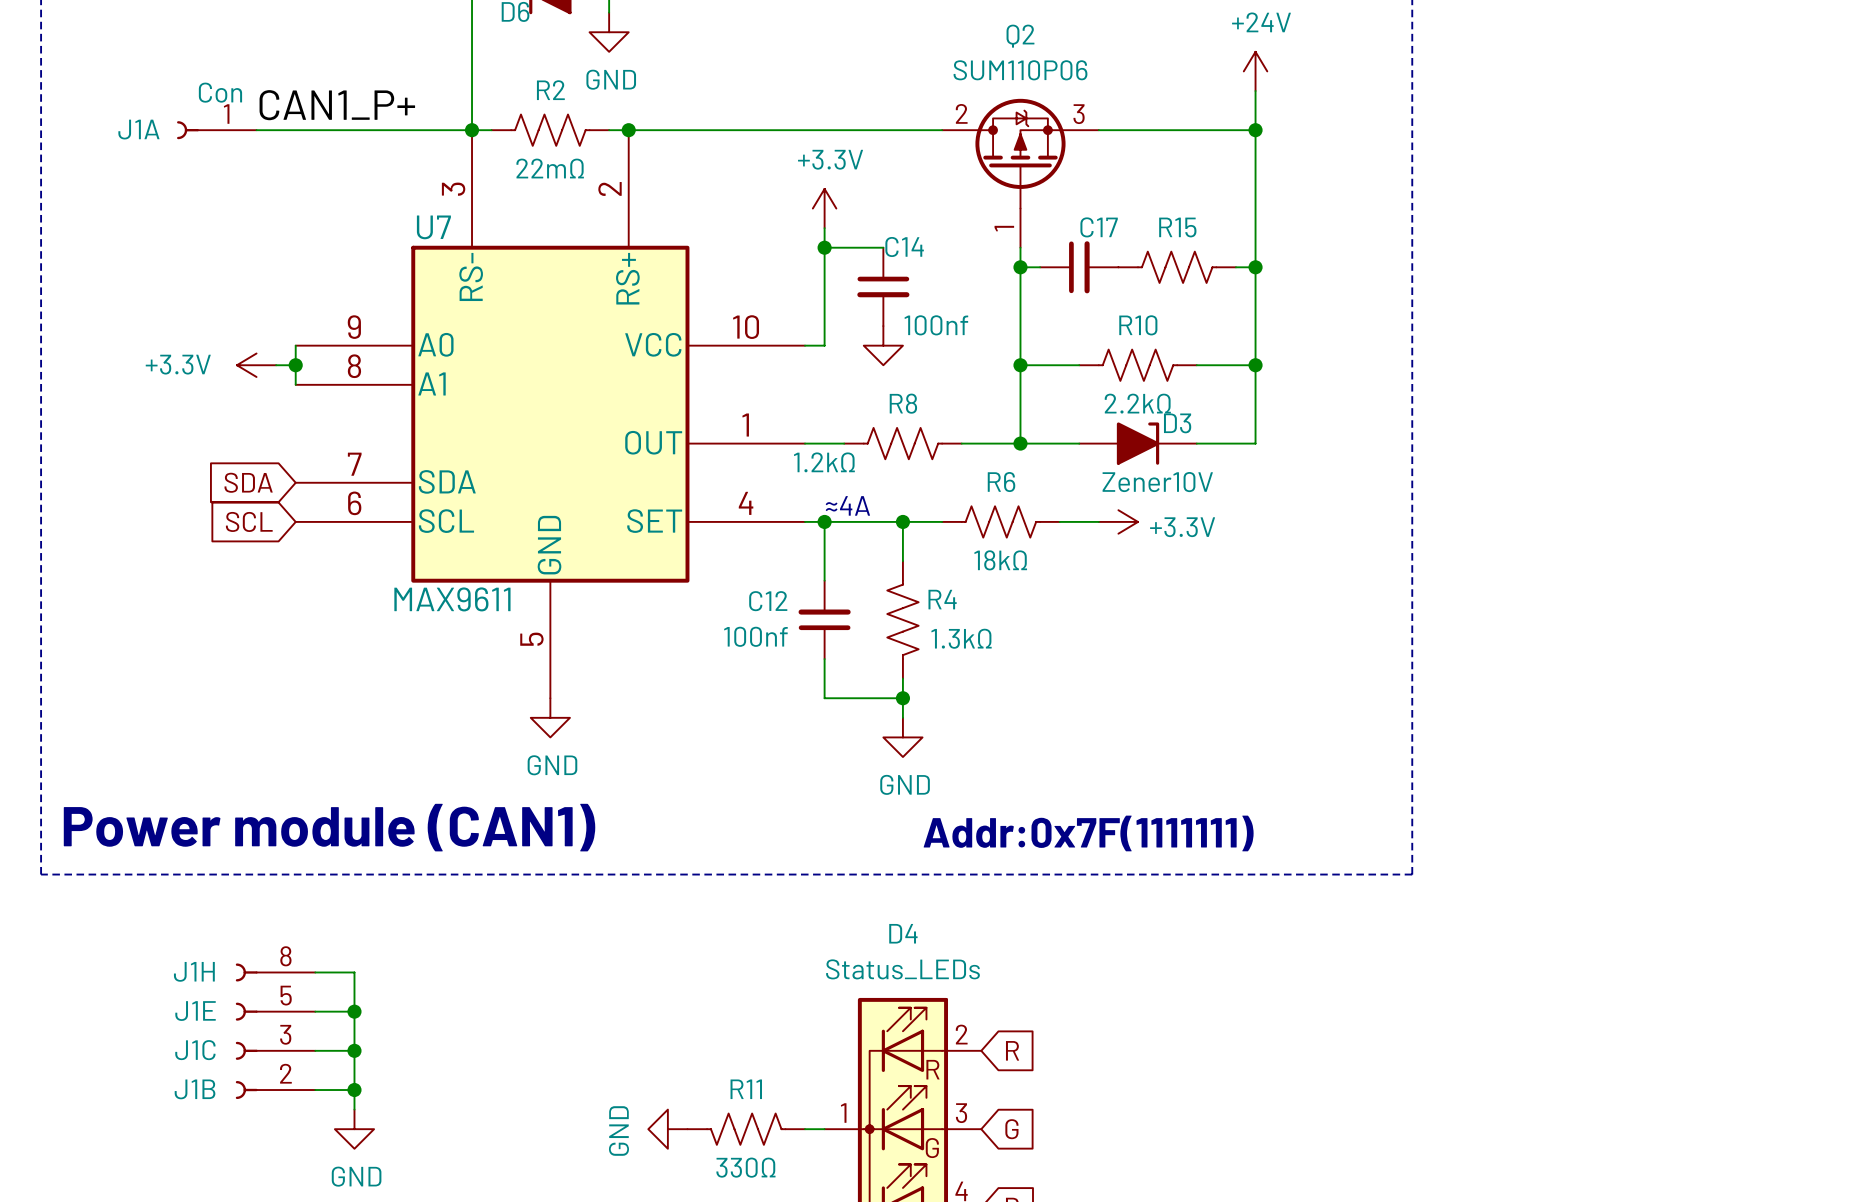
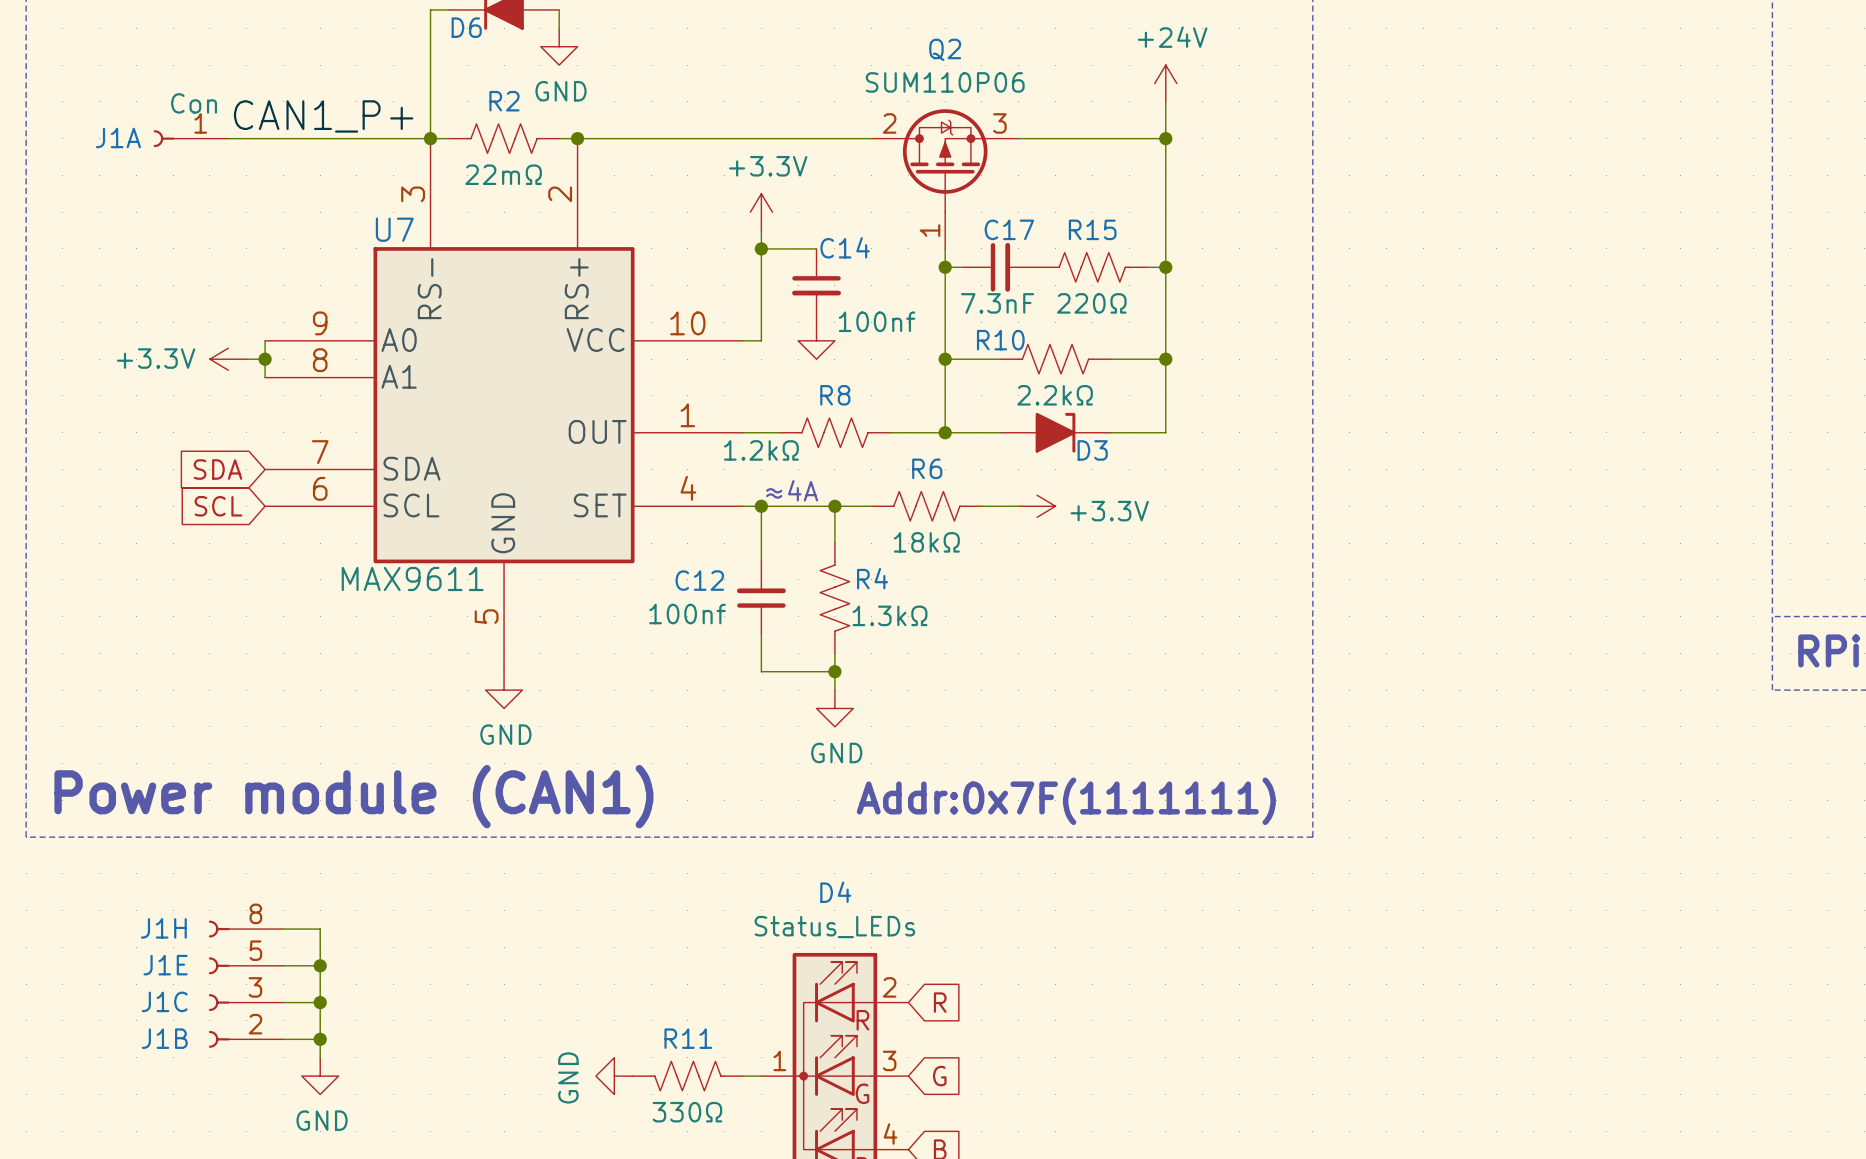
C17 value: none -> 7.3nF (997, 303)
R15 value: none -> 220Ω (1091, 303)
R10 name position: R10 (1138, 325) -> R10 (1000, 340)
D3 name position: D3 (1177, 423) -> D3 (1092, 450)
D3 value: Zener10V (1157, 482) -> none

